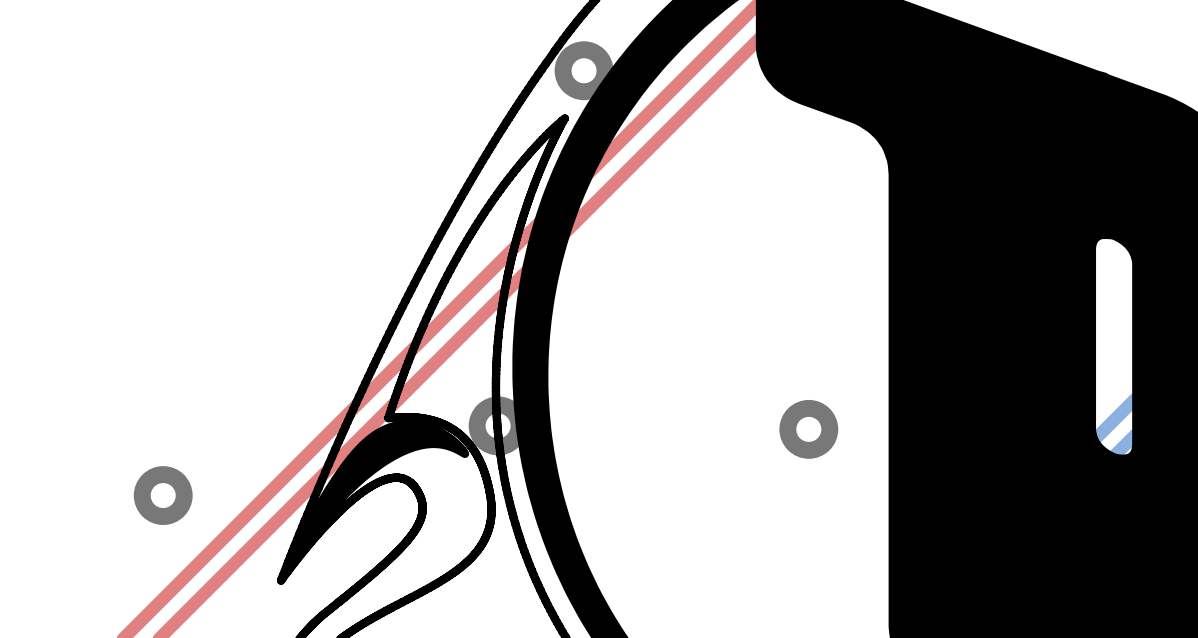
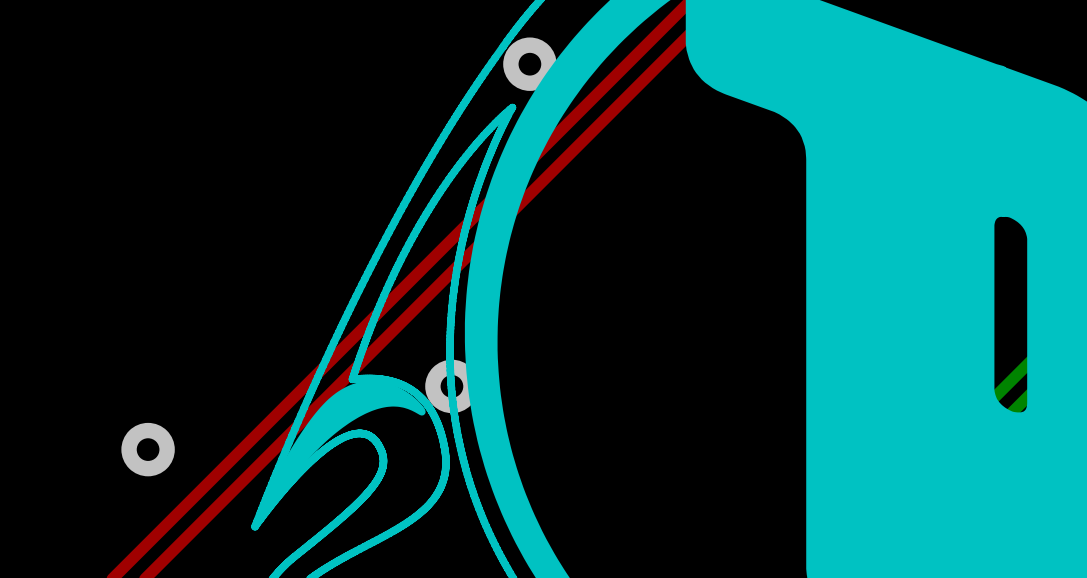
via: (808, 429) -> none

